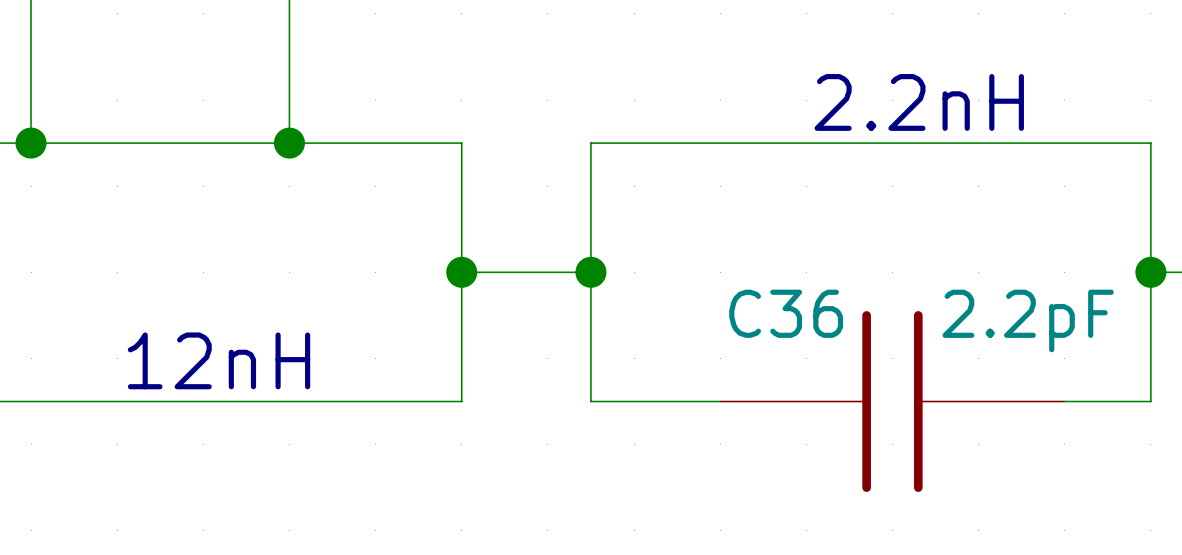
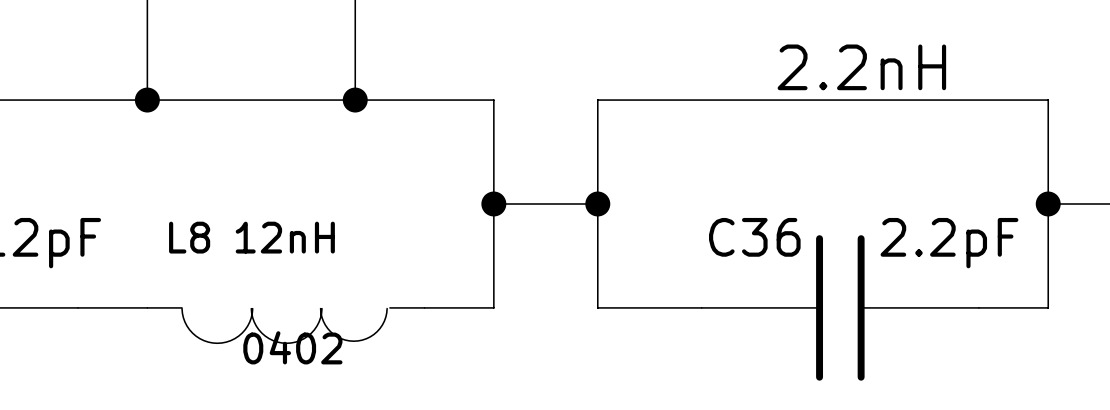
text: 12nH (219, 360) -> none
wire: (31, 401) (375, 401) -> none
L8: none -> 12nH (285, 325)

